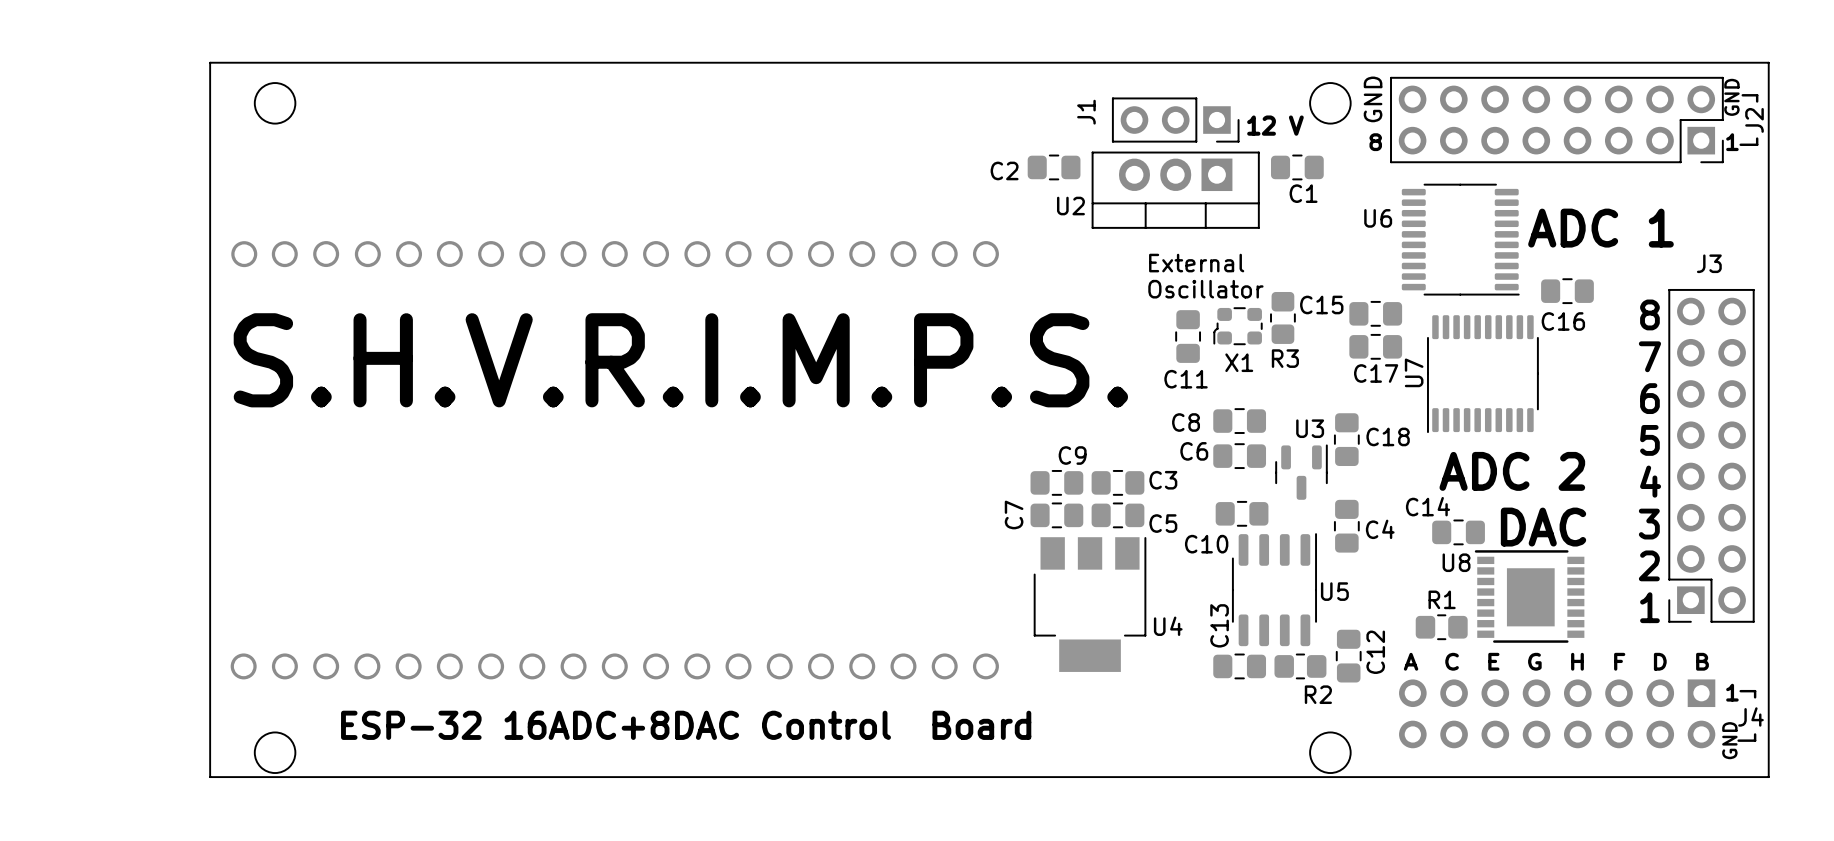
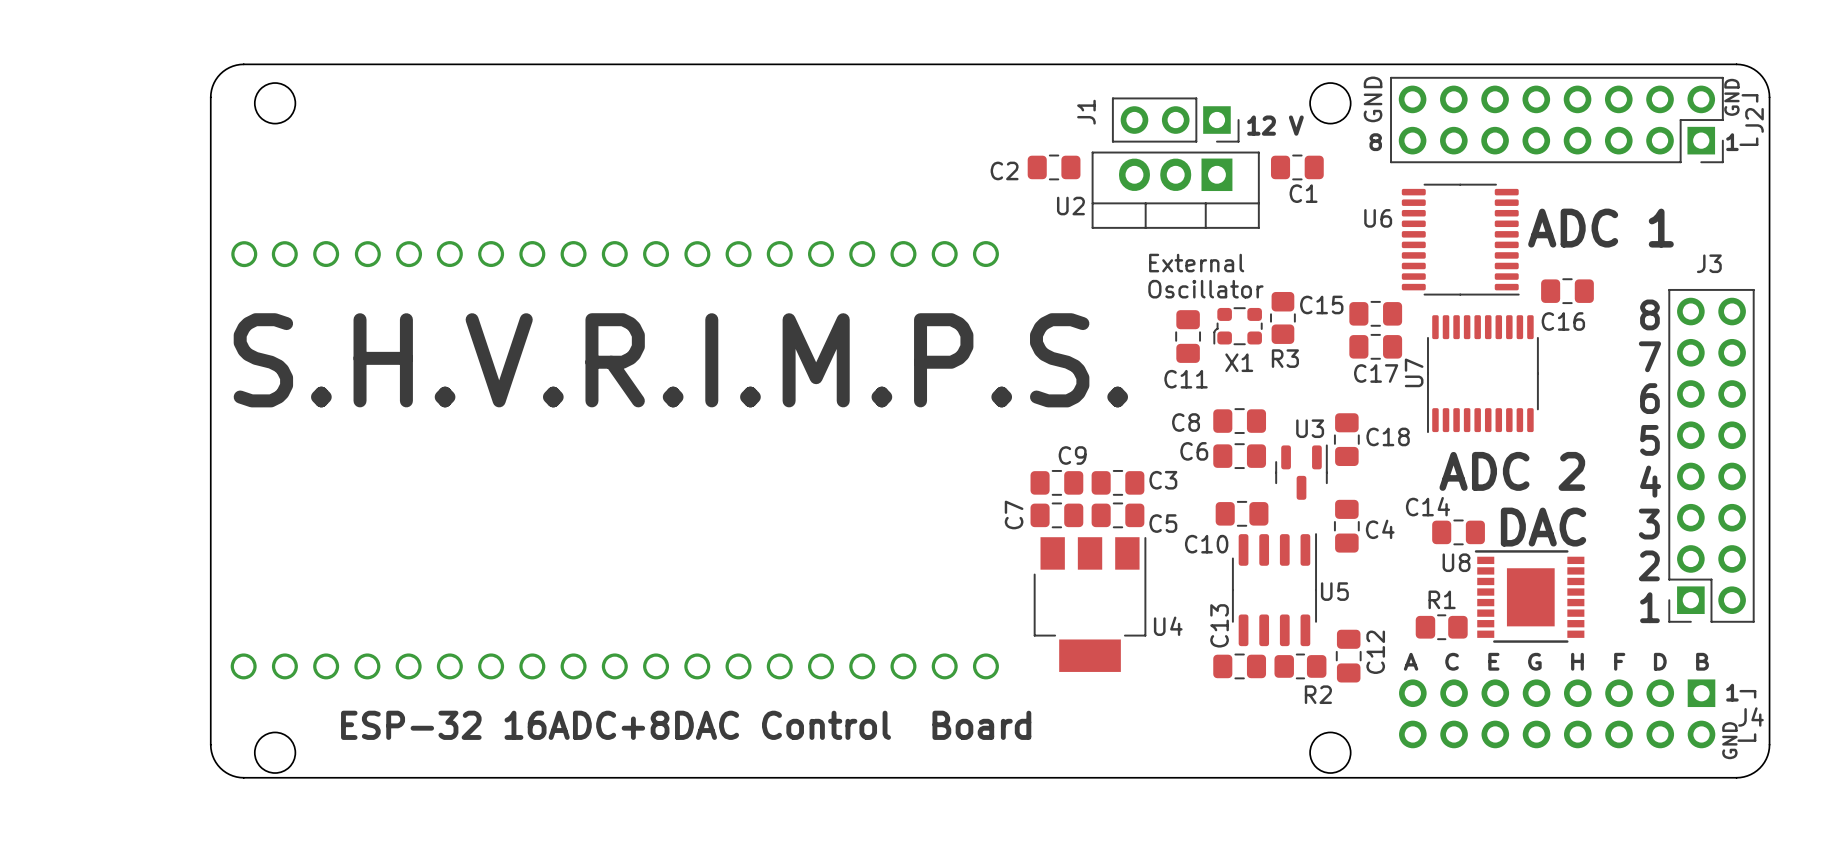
board edge: (210, 62) (1768, 62) (1768, 777) (210, 777) (210, 62) -> (243, 64) (229, 67) (220, 74) (212, 86) (210, 97) (210, 744) (215, 762) (229, 774) (243, 777) (1736, 777) (1754, 772) (1766, 759) (1769, 744) (1769, 97) (1764, 79) (1750, 67) (1736, 64) (243, 64)

